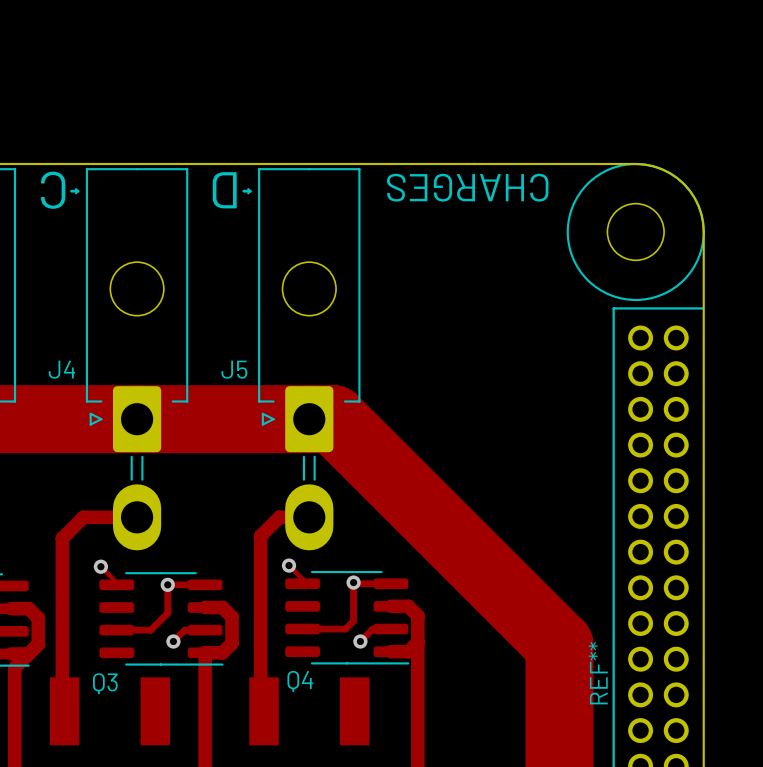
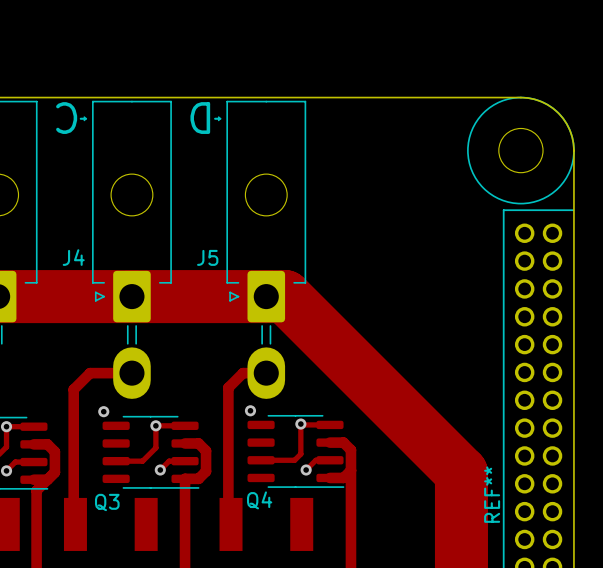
text: CHARGES (467, 187) -> none
track: (289, 565) (302, 579) (302, 583) -> none
track: (100, 566) (116, 584) -> none

